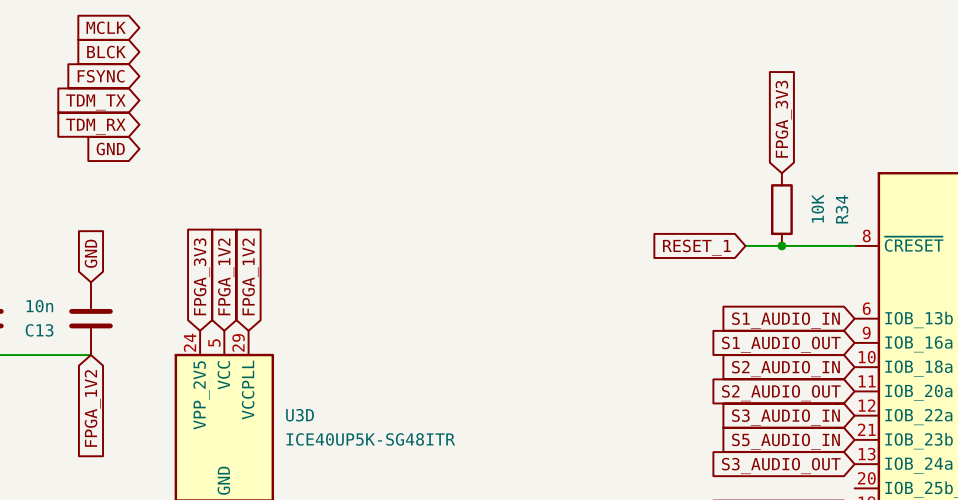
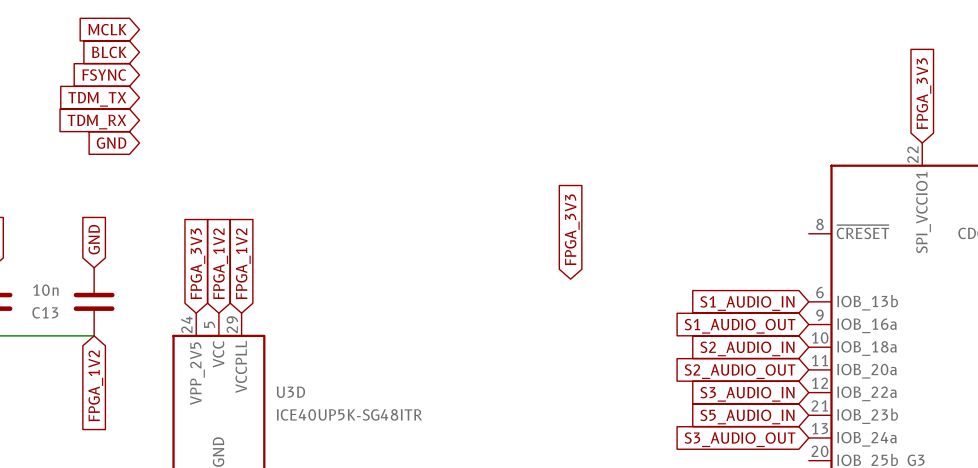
global label: FPGA_3V3 (783, 119) -> none
R34: 10K (781, 209) -> none
global label: none -> FPGA_3V3 (572, 229)
wire: (745, 245) (854, 245) -> none
junction: (781, 245) -> none
global label: RESET_1 (696, 247) -> none

